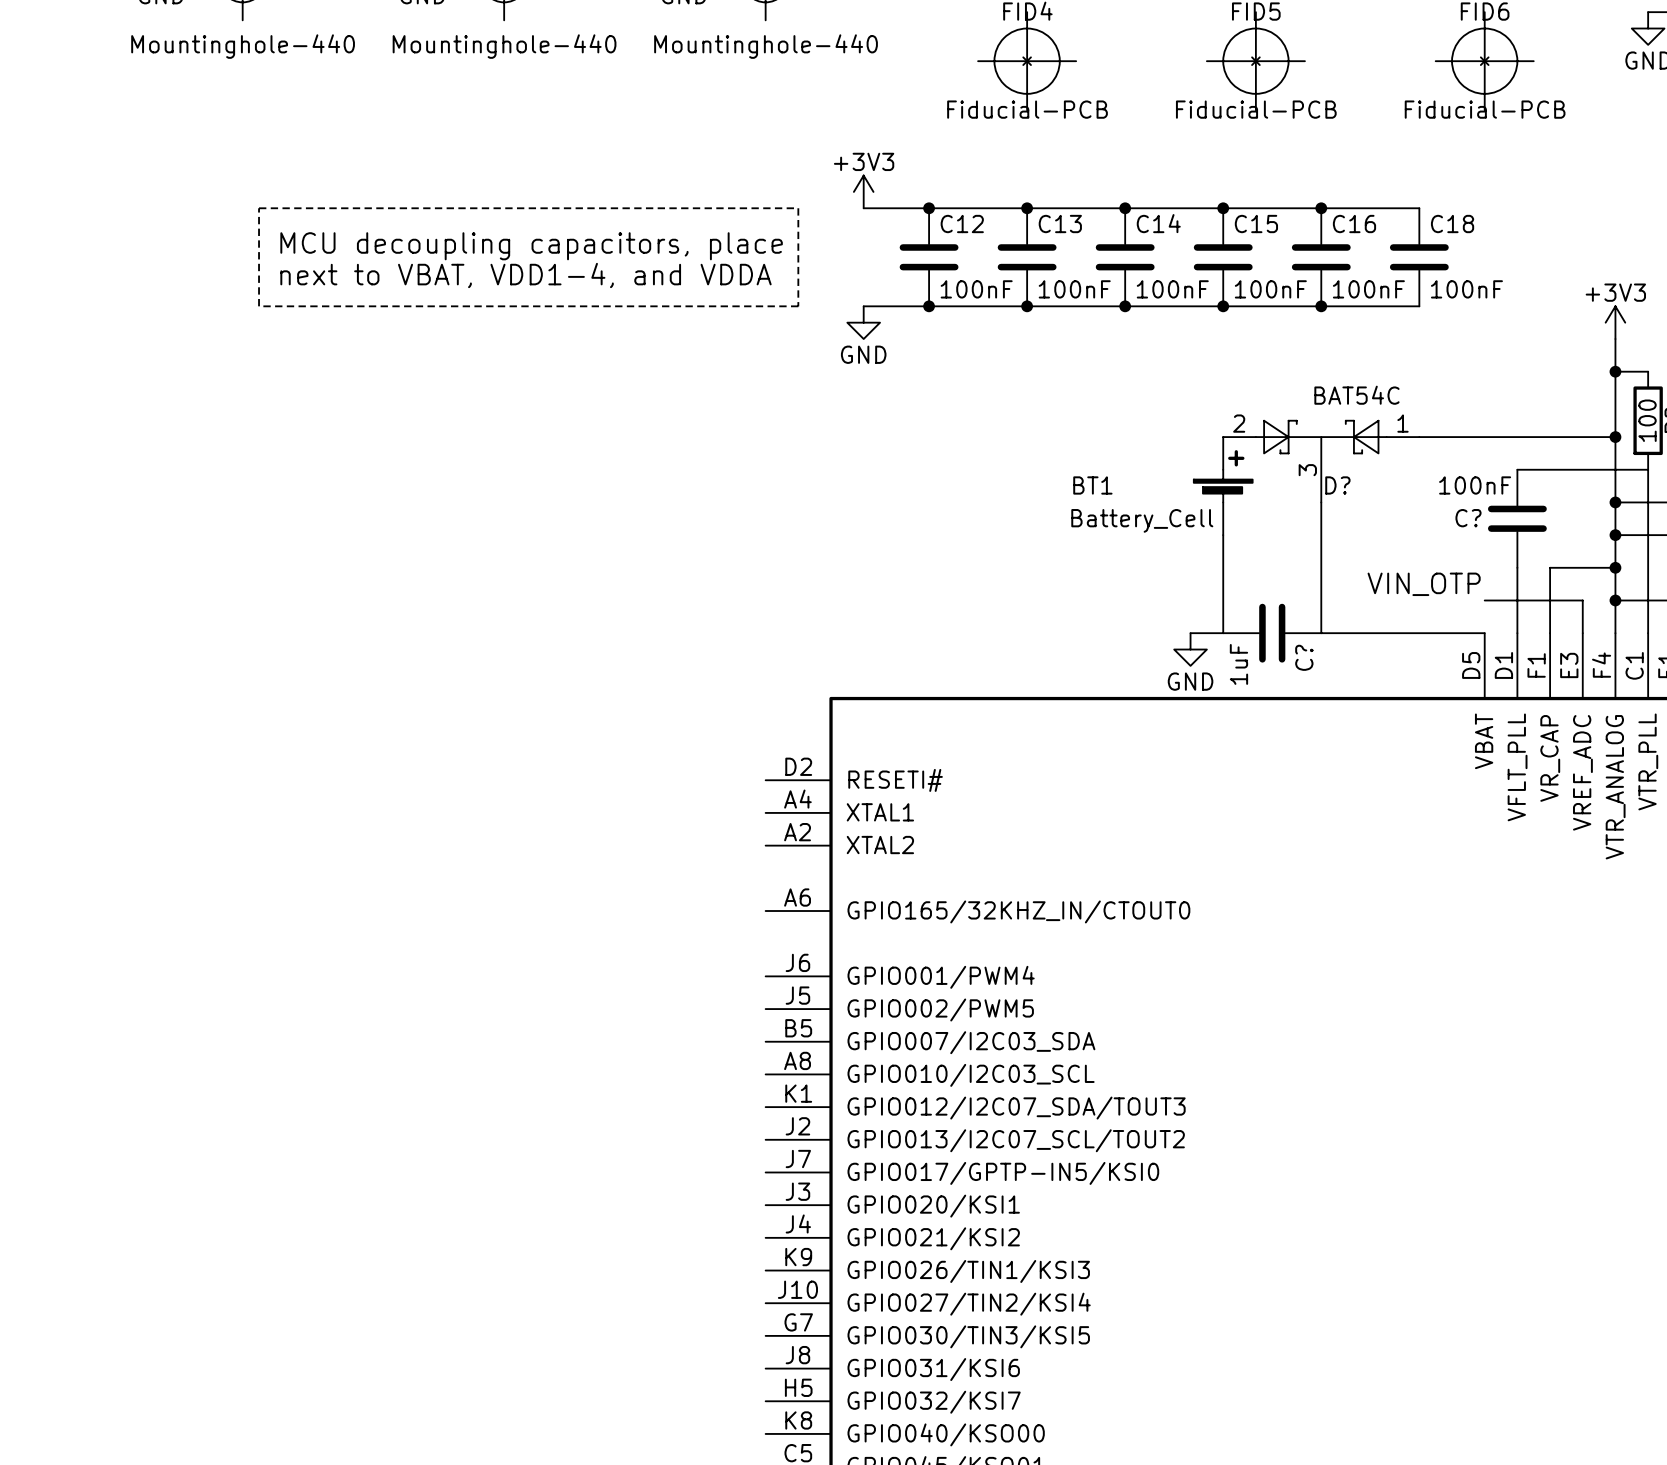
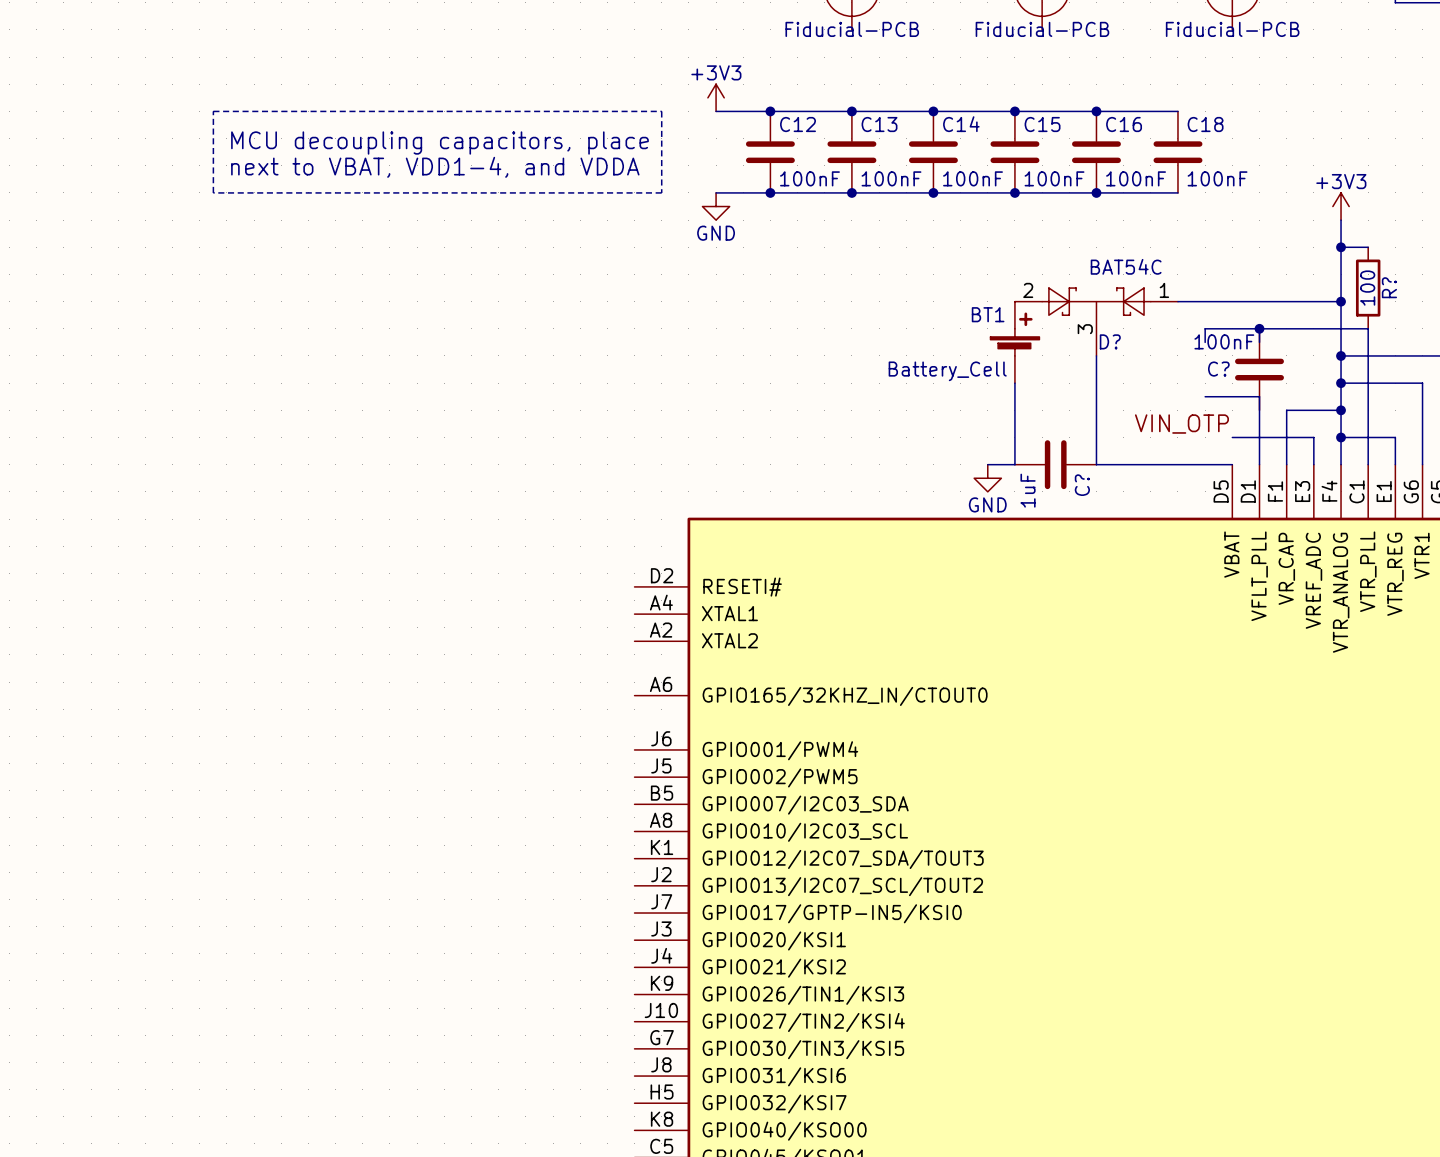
junction: none -> (1259, 328)
BT1 name position: BT1 (1092, 485) -> BT1 (988, 314)
wire: none -> (1205, 342) (1205, 328) (1259, 328) (1259, 342)
wire: none -> (1205, 396) (1259, 396) (1259, 410)

